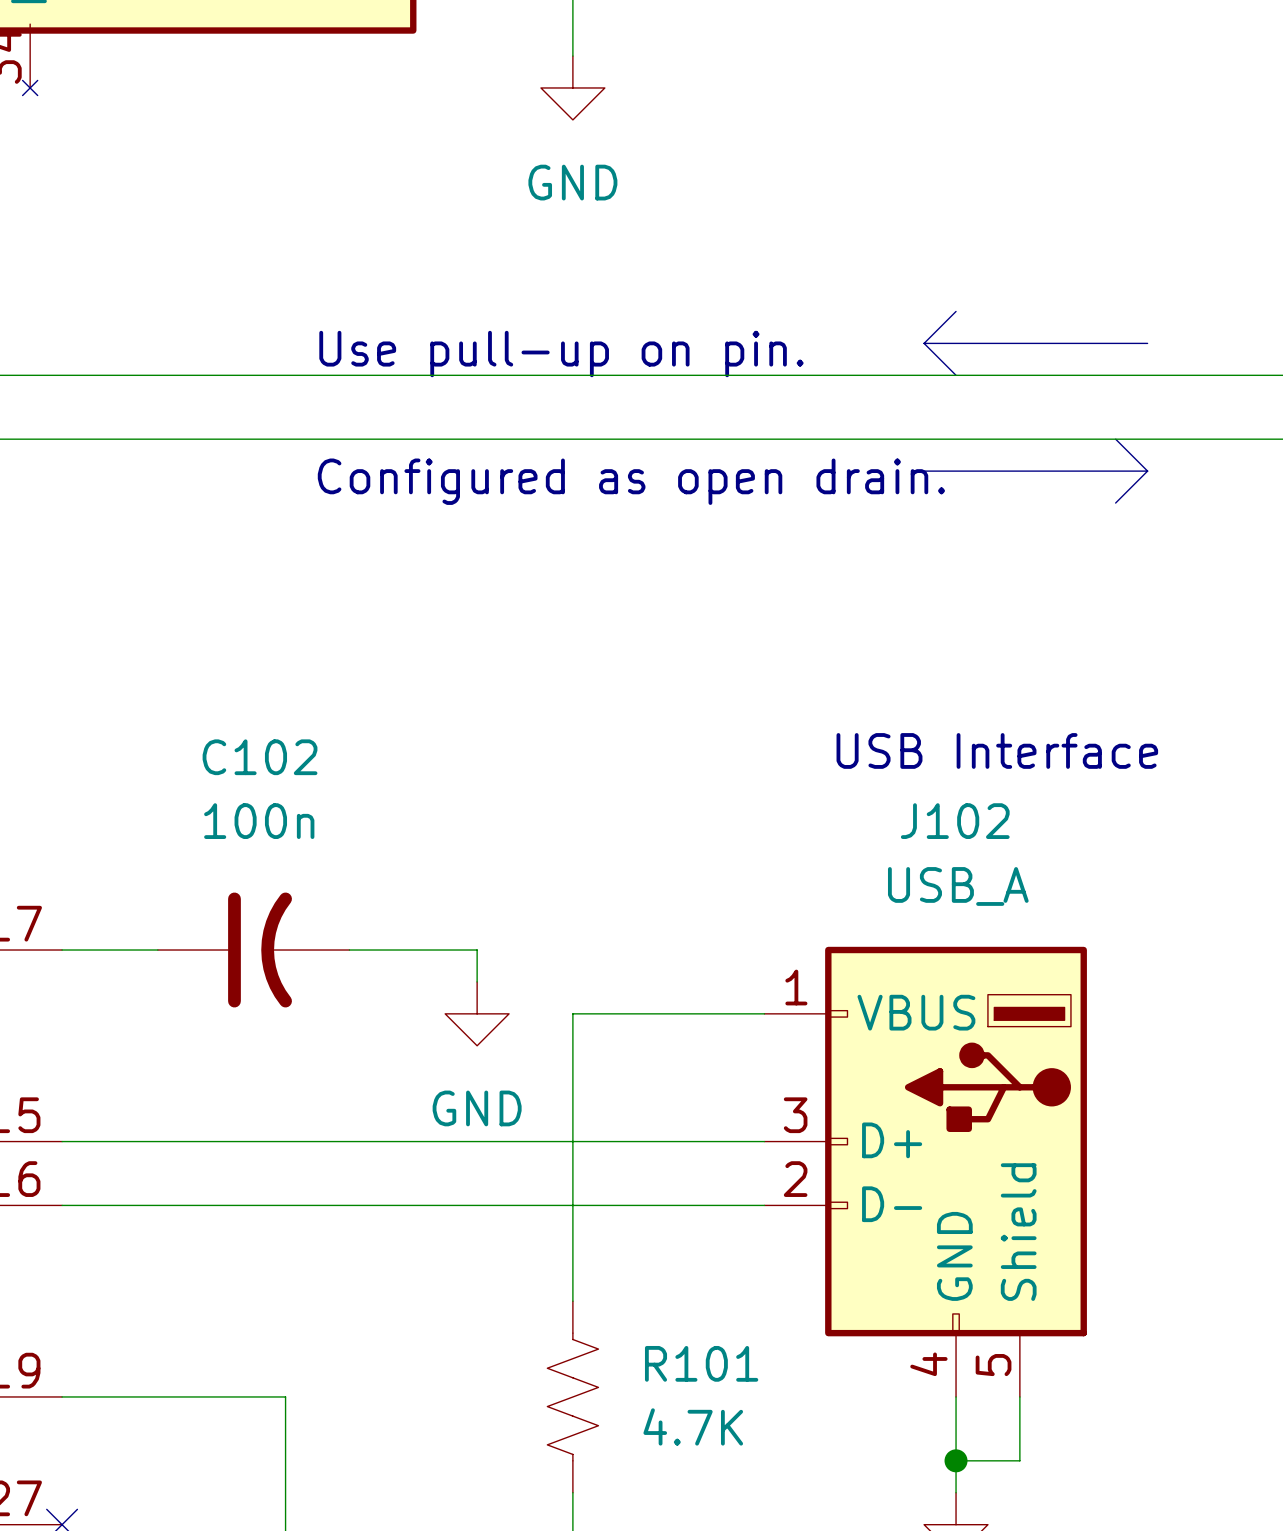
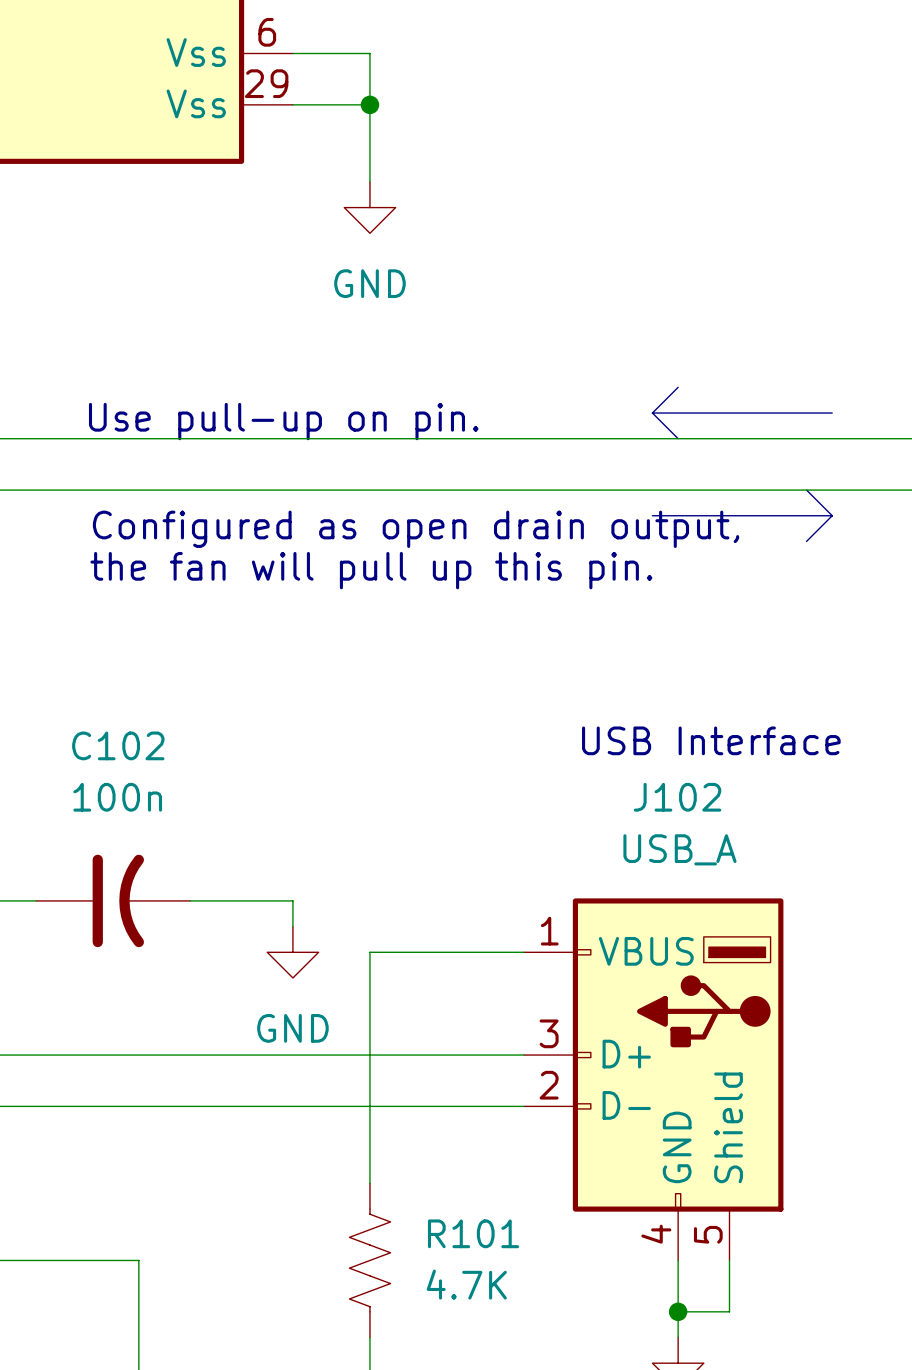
text position: Use pull-up on pin. (561, 354) -> Use pull-up on pin. (283, 421)
text: Configured as open drain. (631, 481) -> Configured as open drain output, (416, 529)
text: none -> the fan will pull up this pin. (371, 570)

